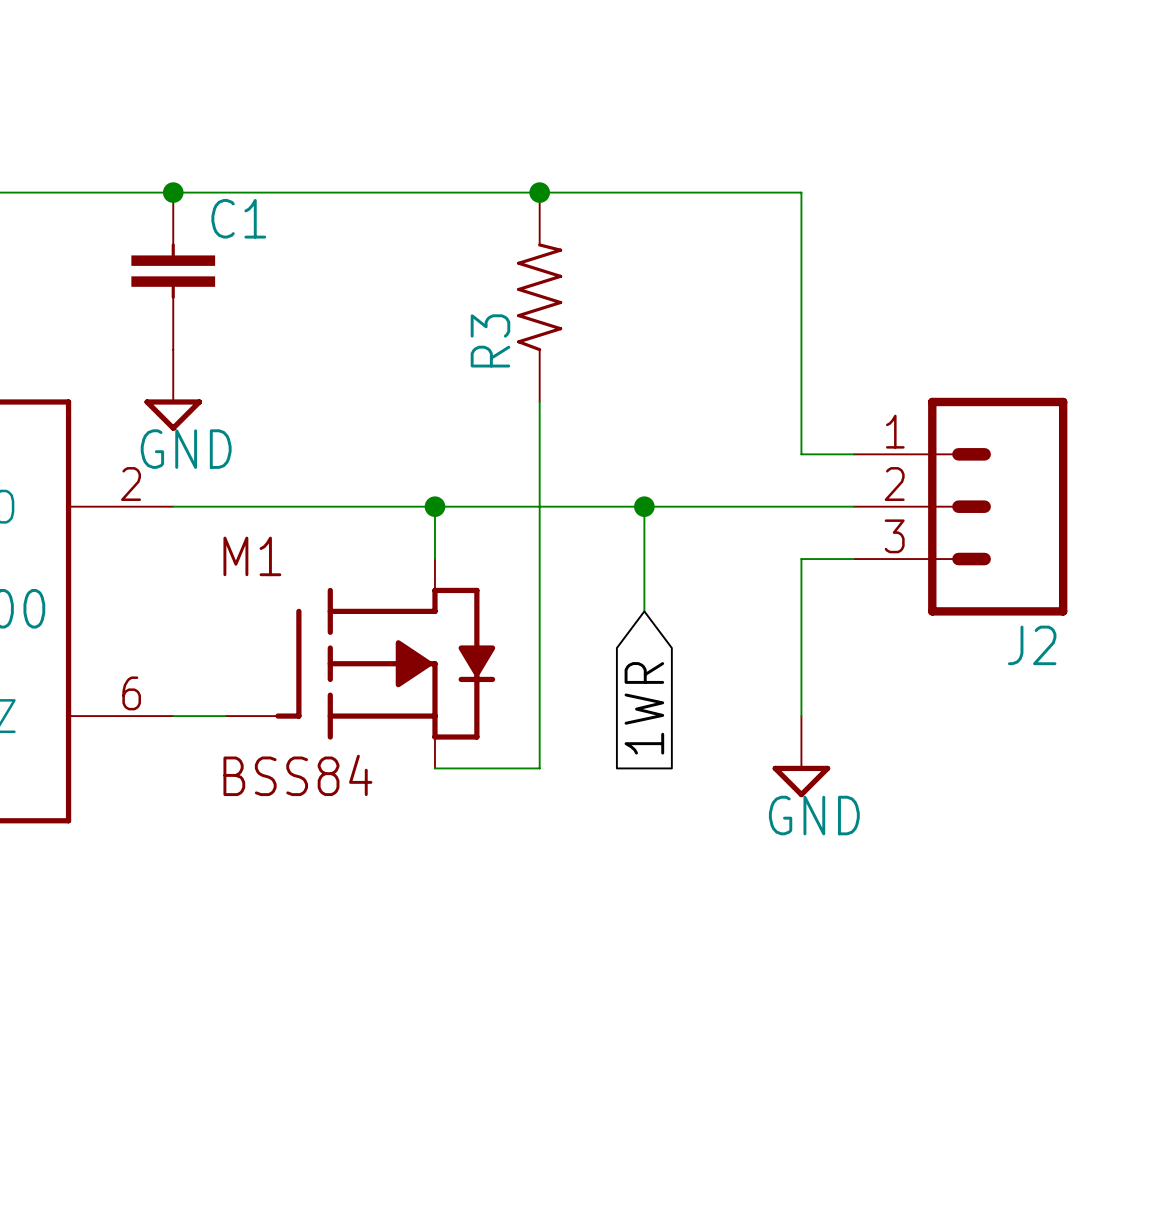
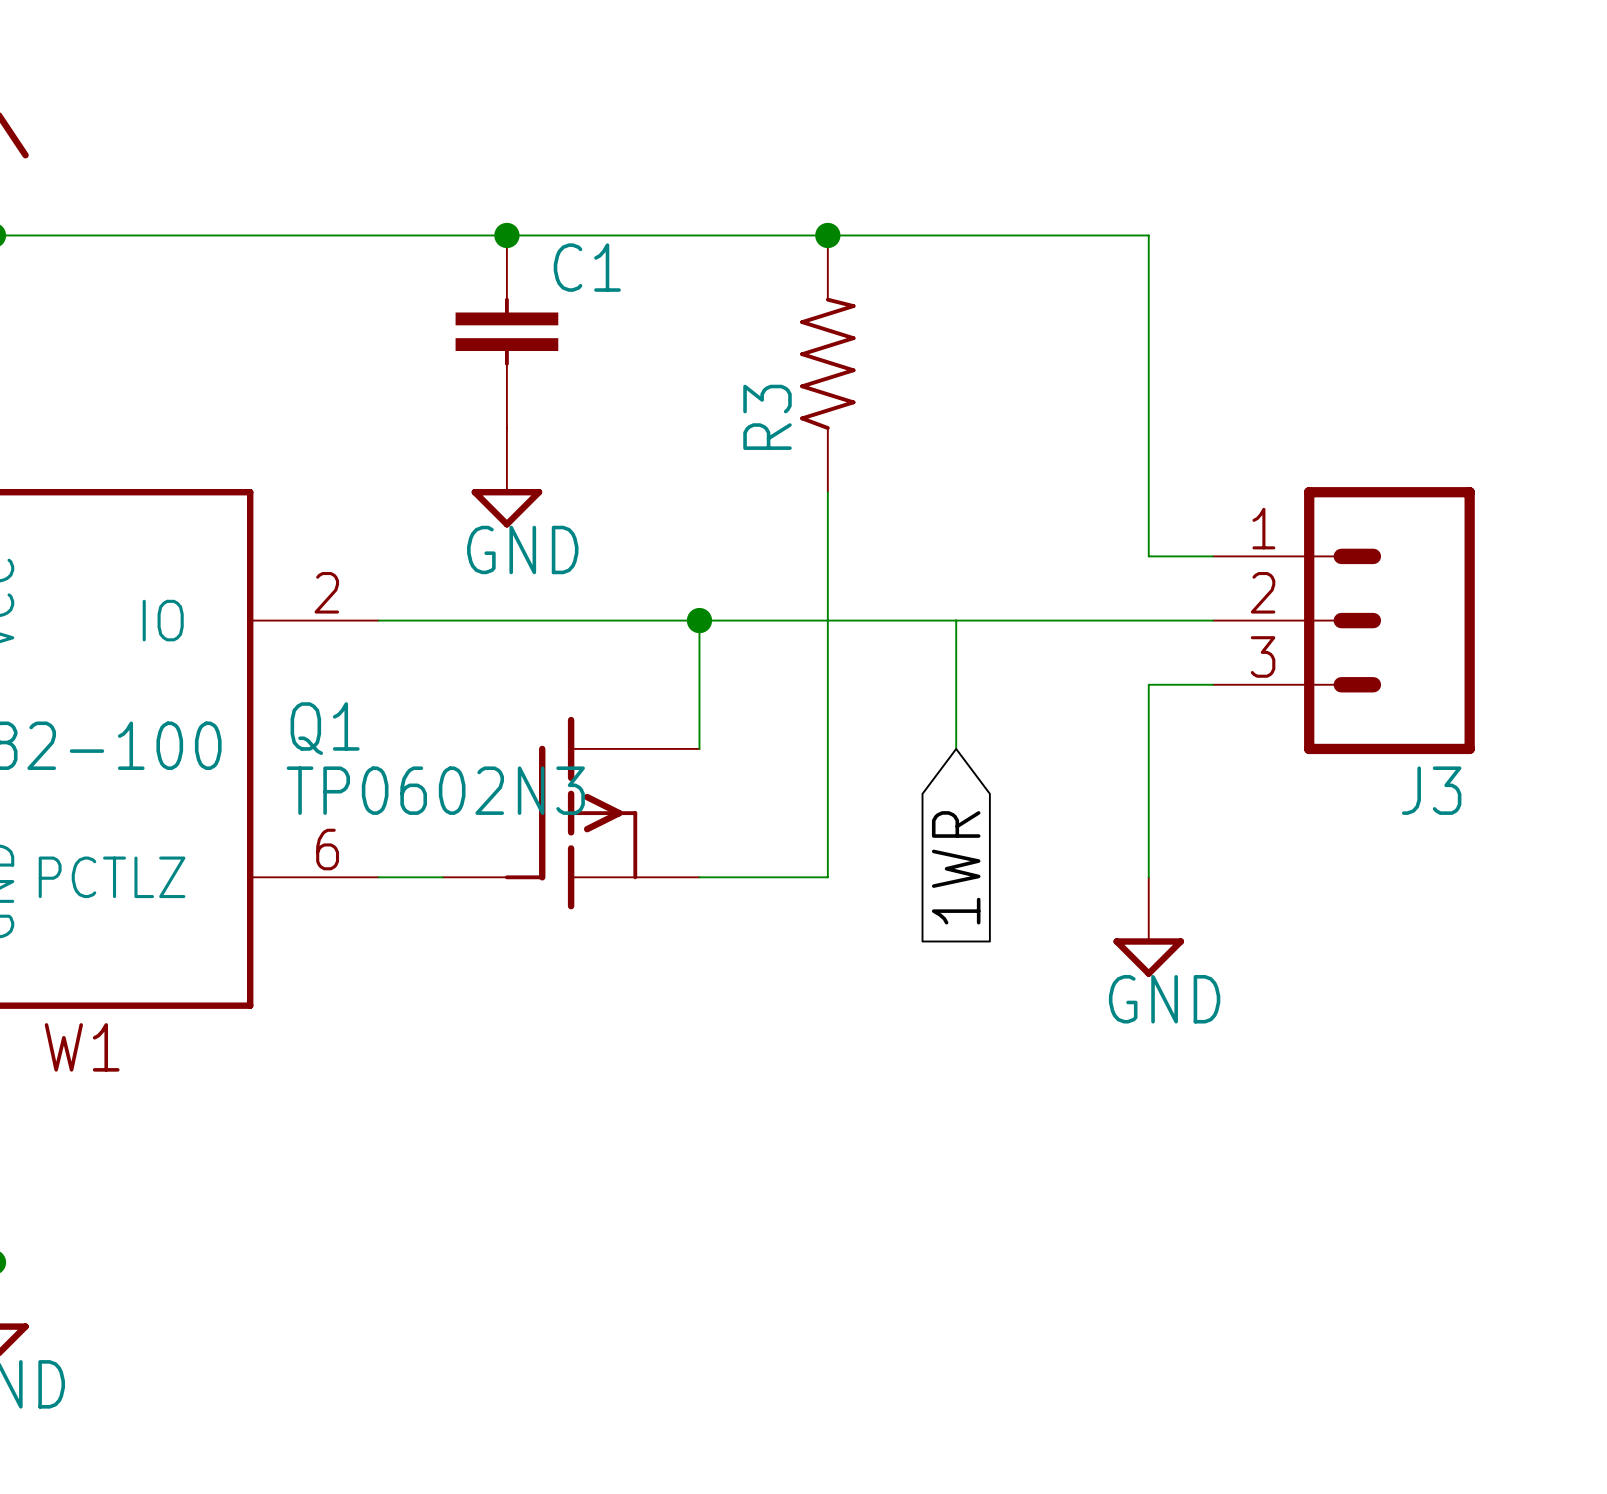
junction position: (173, 192) -> (506, 235)
C1 position: (173, 271) -> (506, 331)
power symbol position: GND (173, 390) -> GND (506, 477)
junction: (644, 506) -> none
J2 name: J2 (1032, 645) -> J3 (1431, 790)
Q1: none -> TP0602N3 (571, 813)
M1: BSS84 (360, 663) -> none
wire: (539, 716) (539, 768) (434, 768) -> (827, 877) (699, 877)

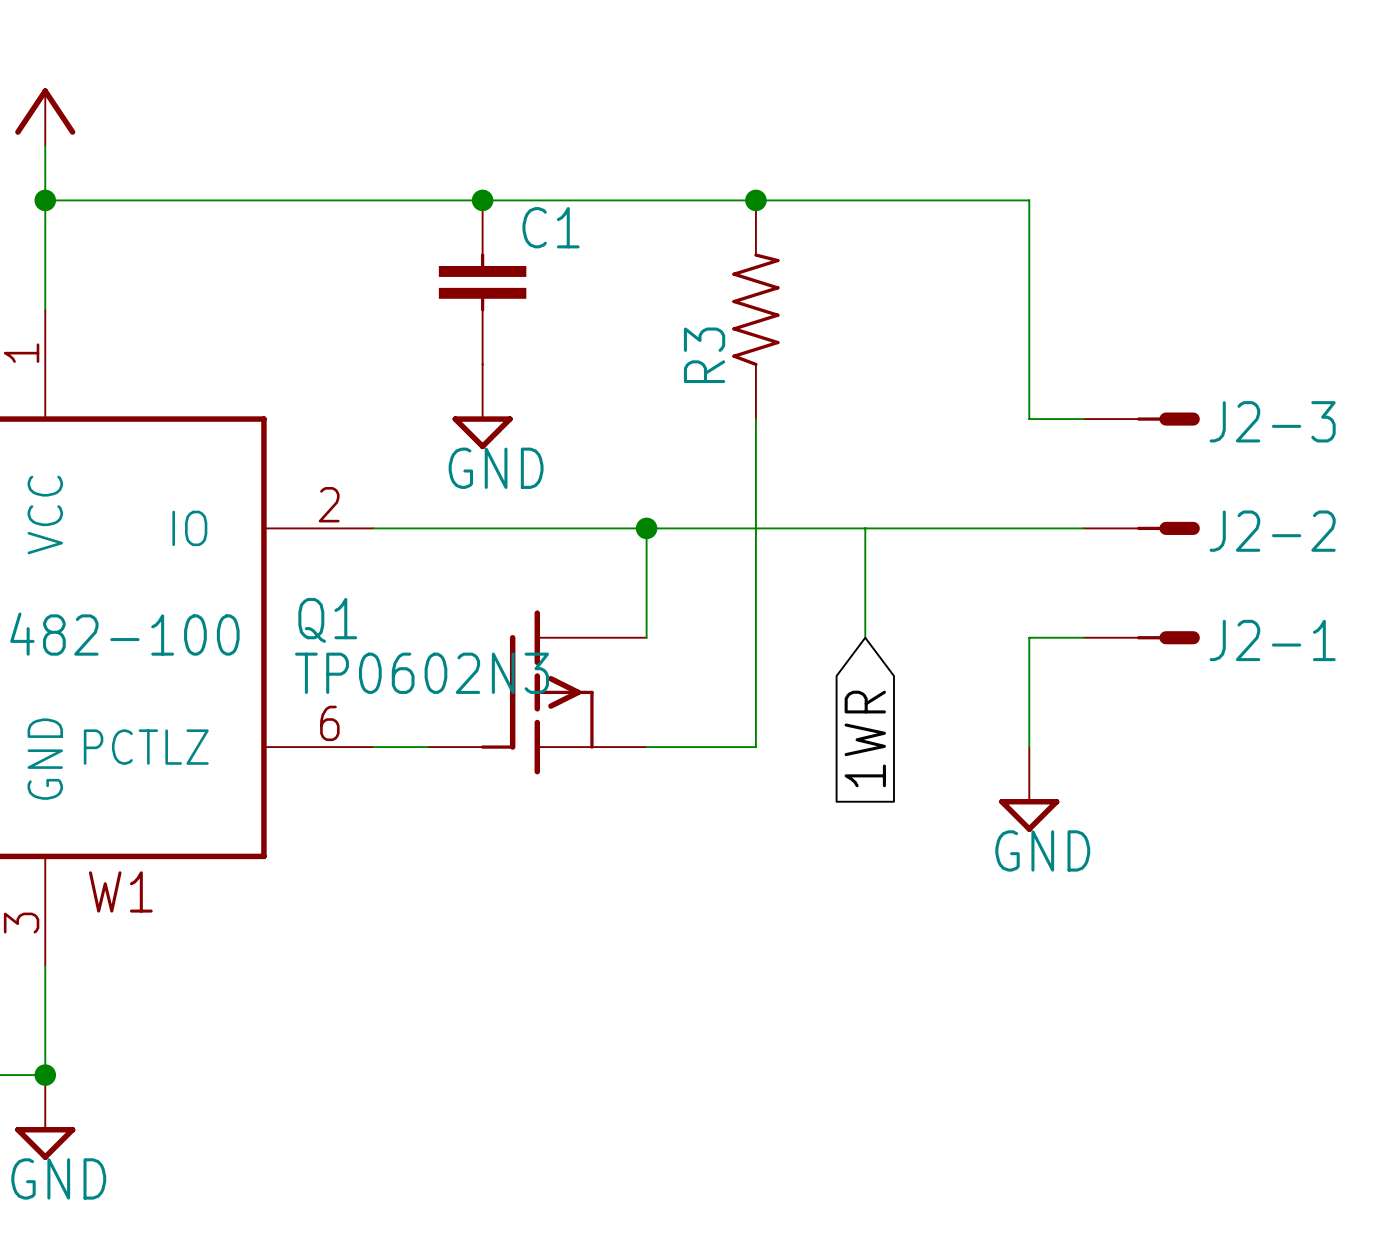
wire: (1148, 492) (1148, 556) (1212, 556) -> (1029, 419) (1083, 419)
J2-3: none -> (1141, 419)
J2-2: none -> (1141, 528)
J3: (1343, 620) -> none
wire: (1212, 684) (1148, 684) (1148, 748) -> (1083, 637) (1029, 637)
J2-1: none -> (1141, 637)

